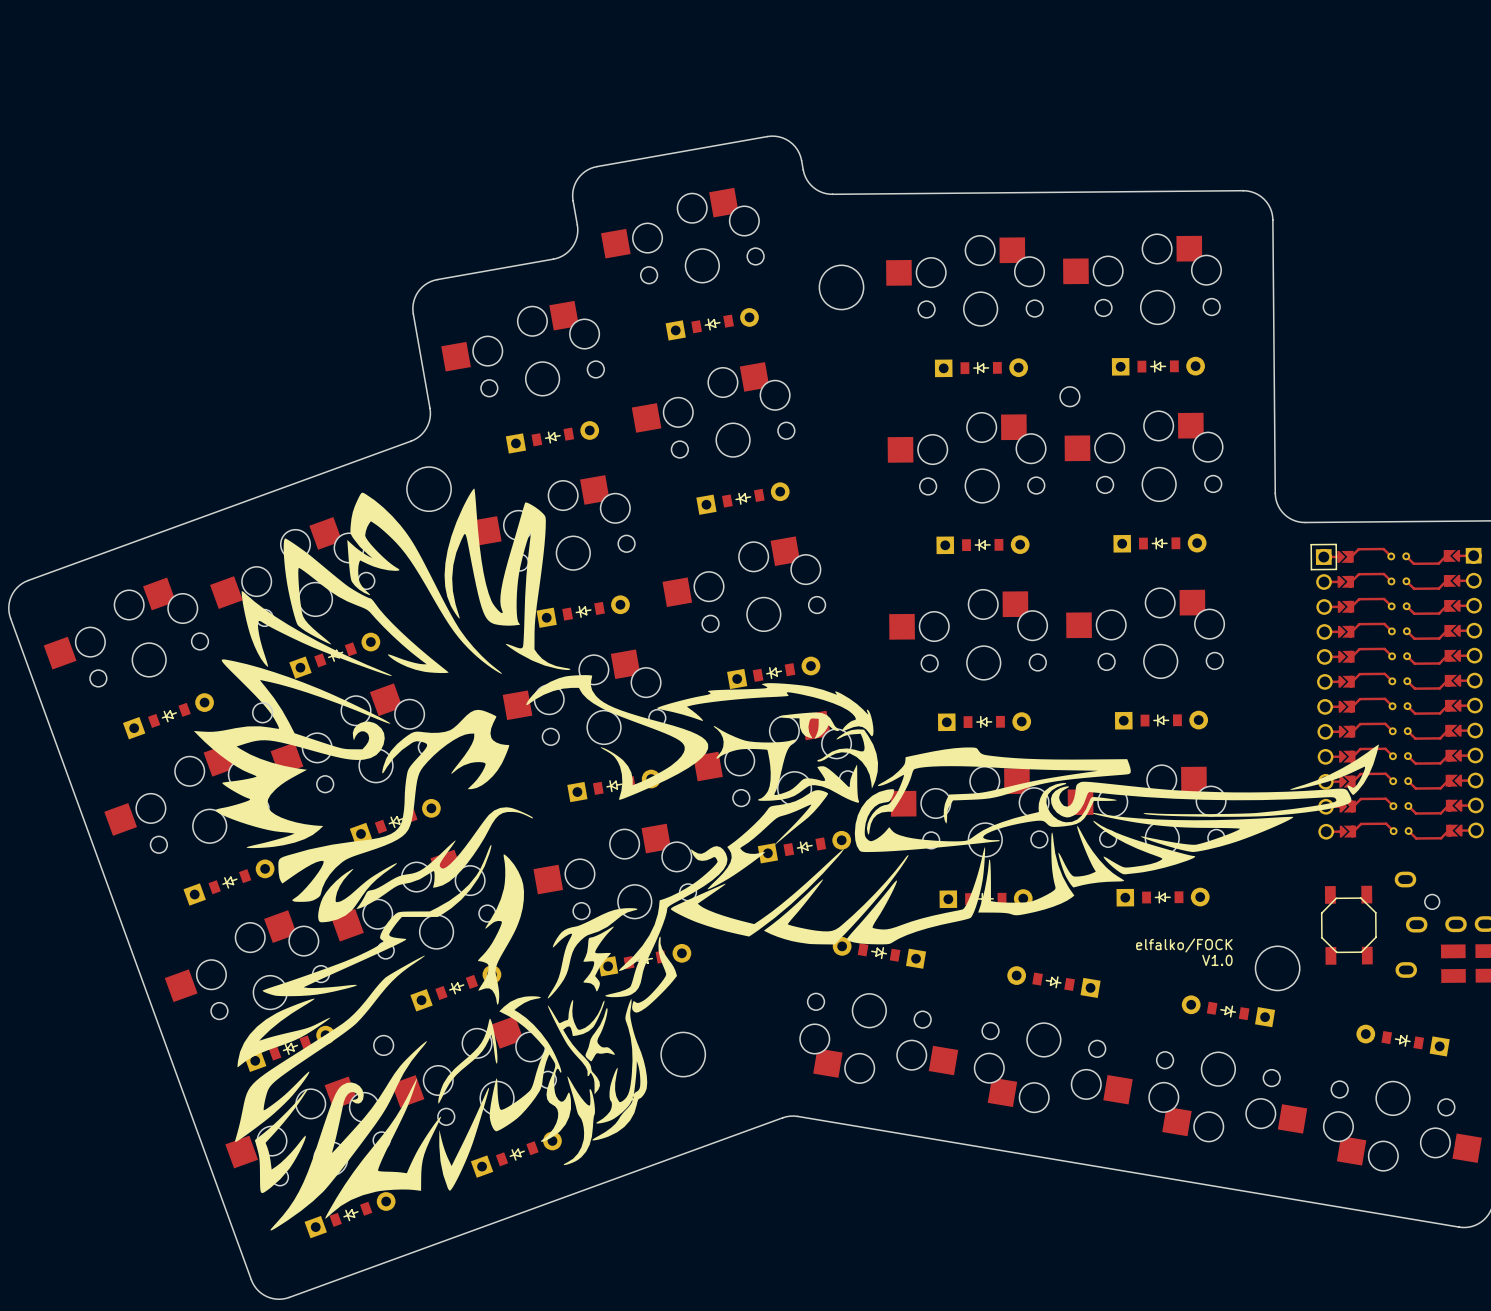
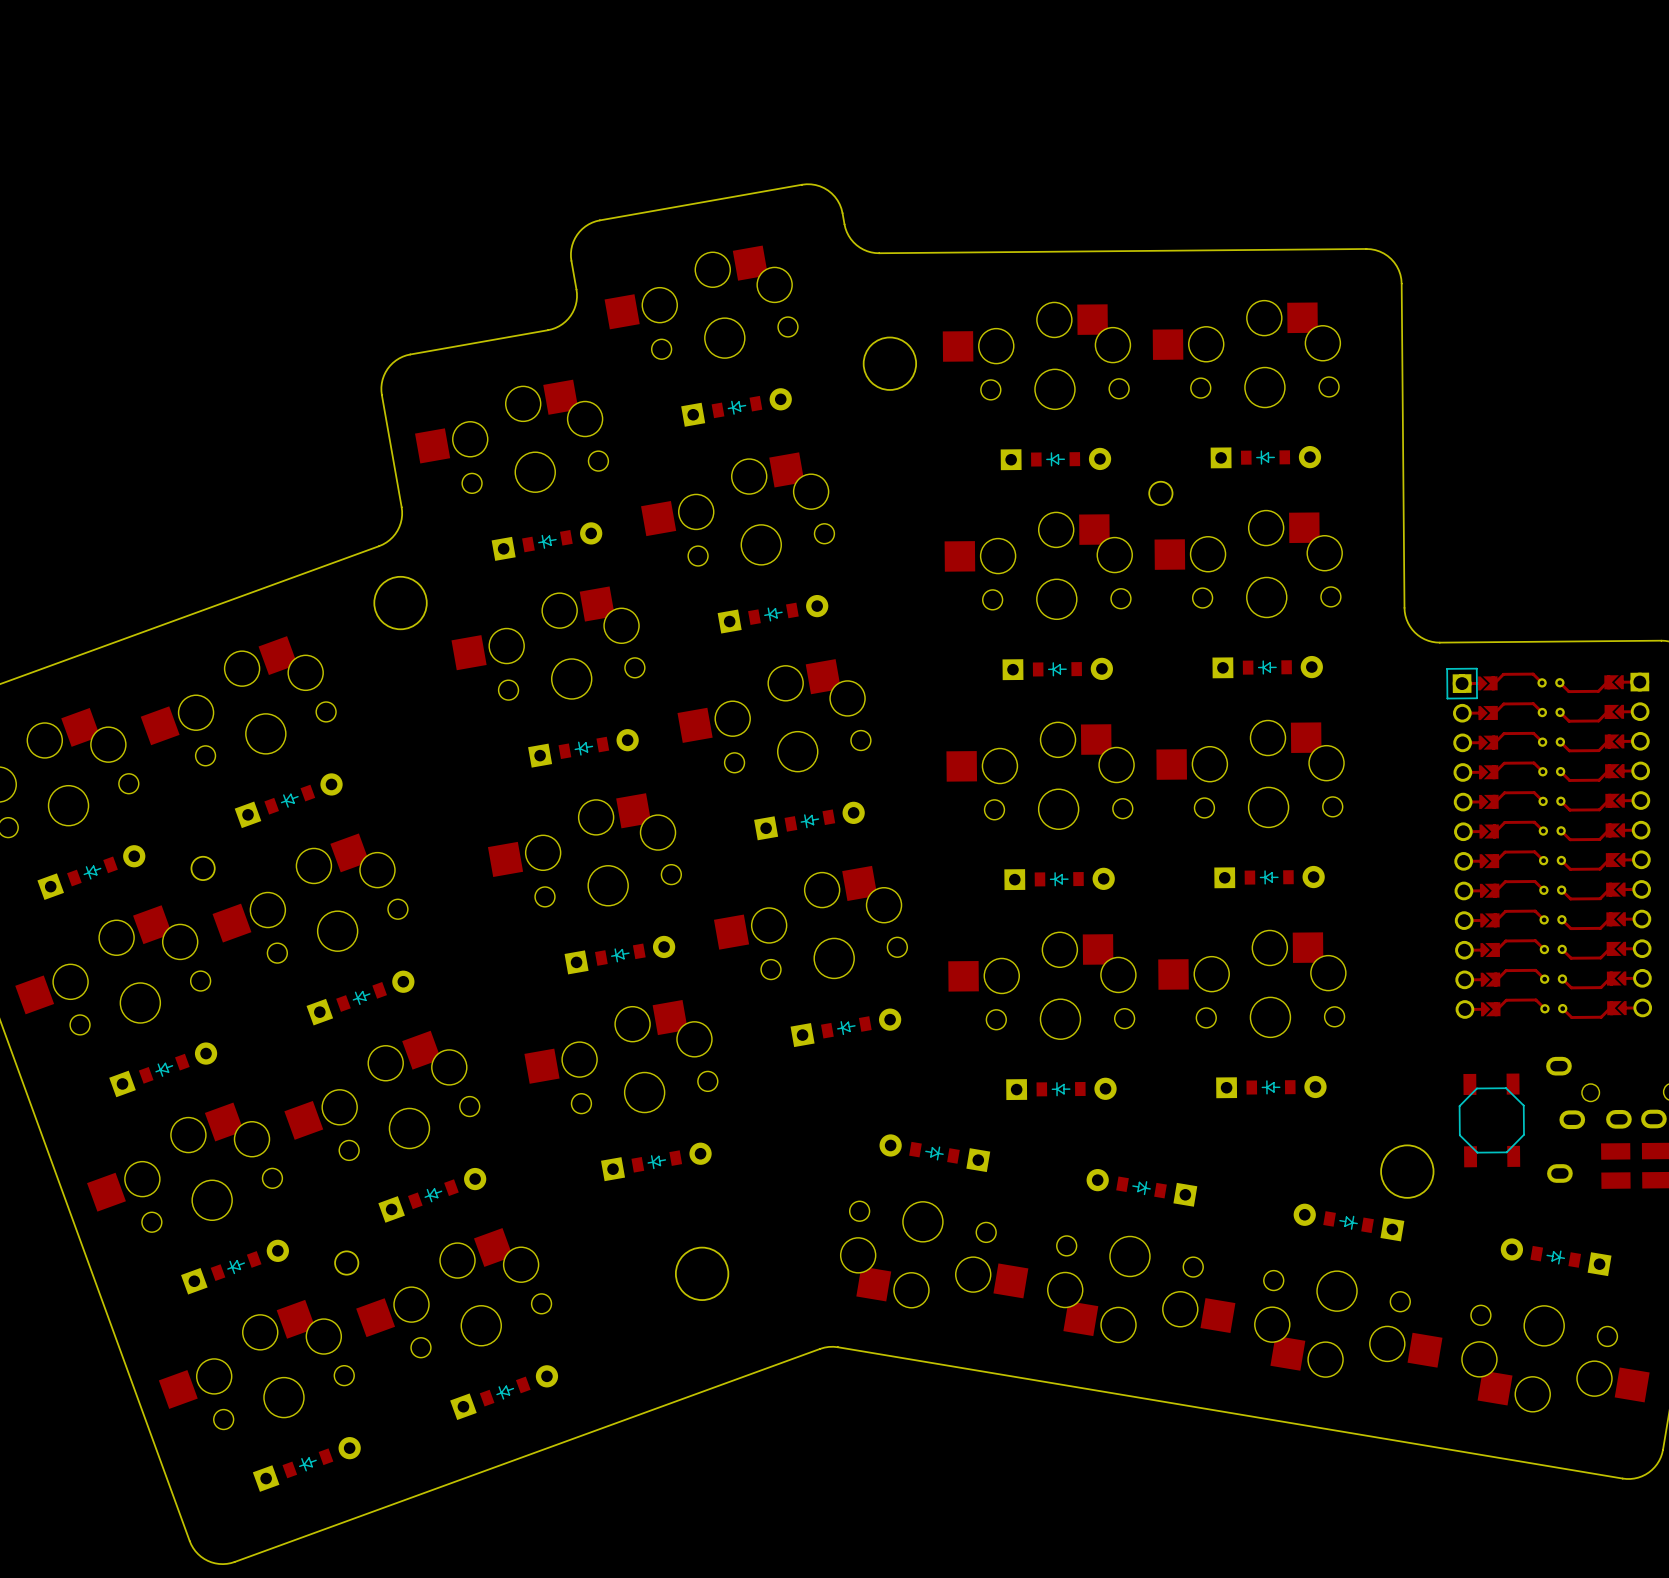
drawing: [193, 488, 1379, 1231] -> none
text: elfalko/FOCK (1184, 945) -> none
text: V1.0 (1217, 960) -> none

